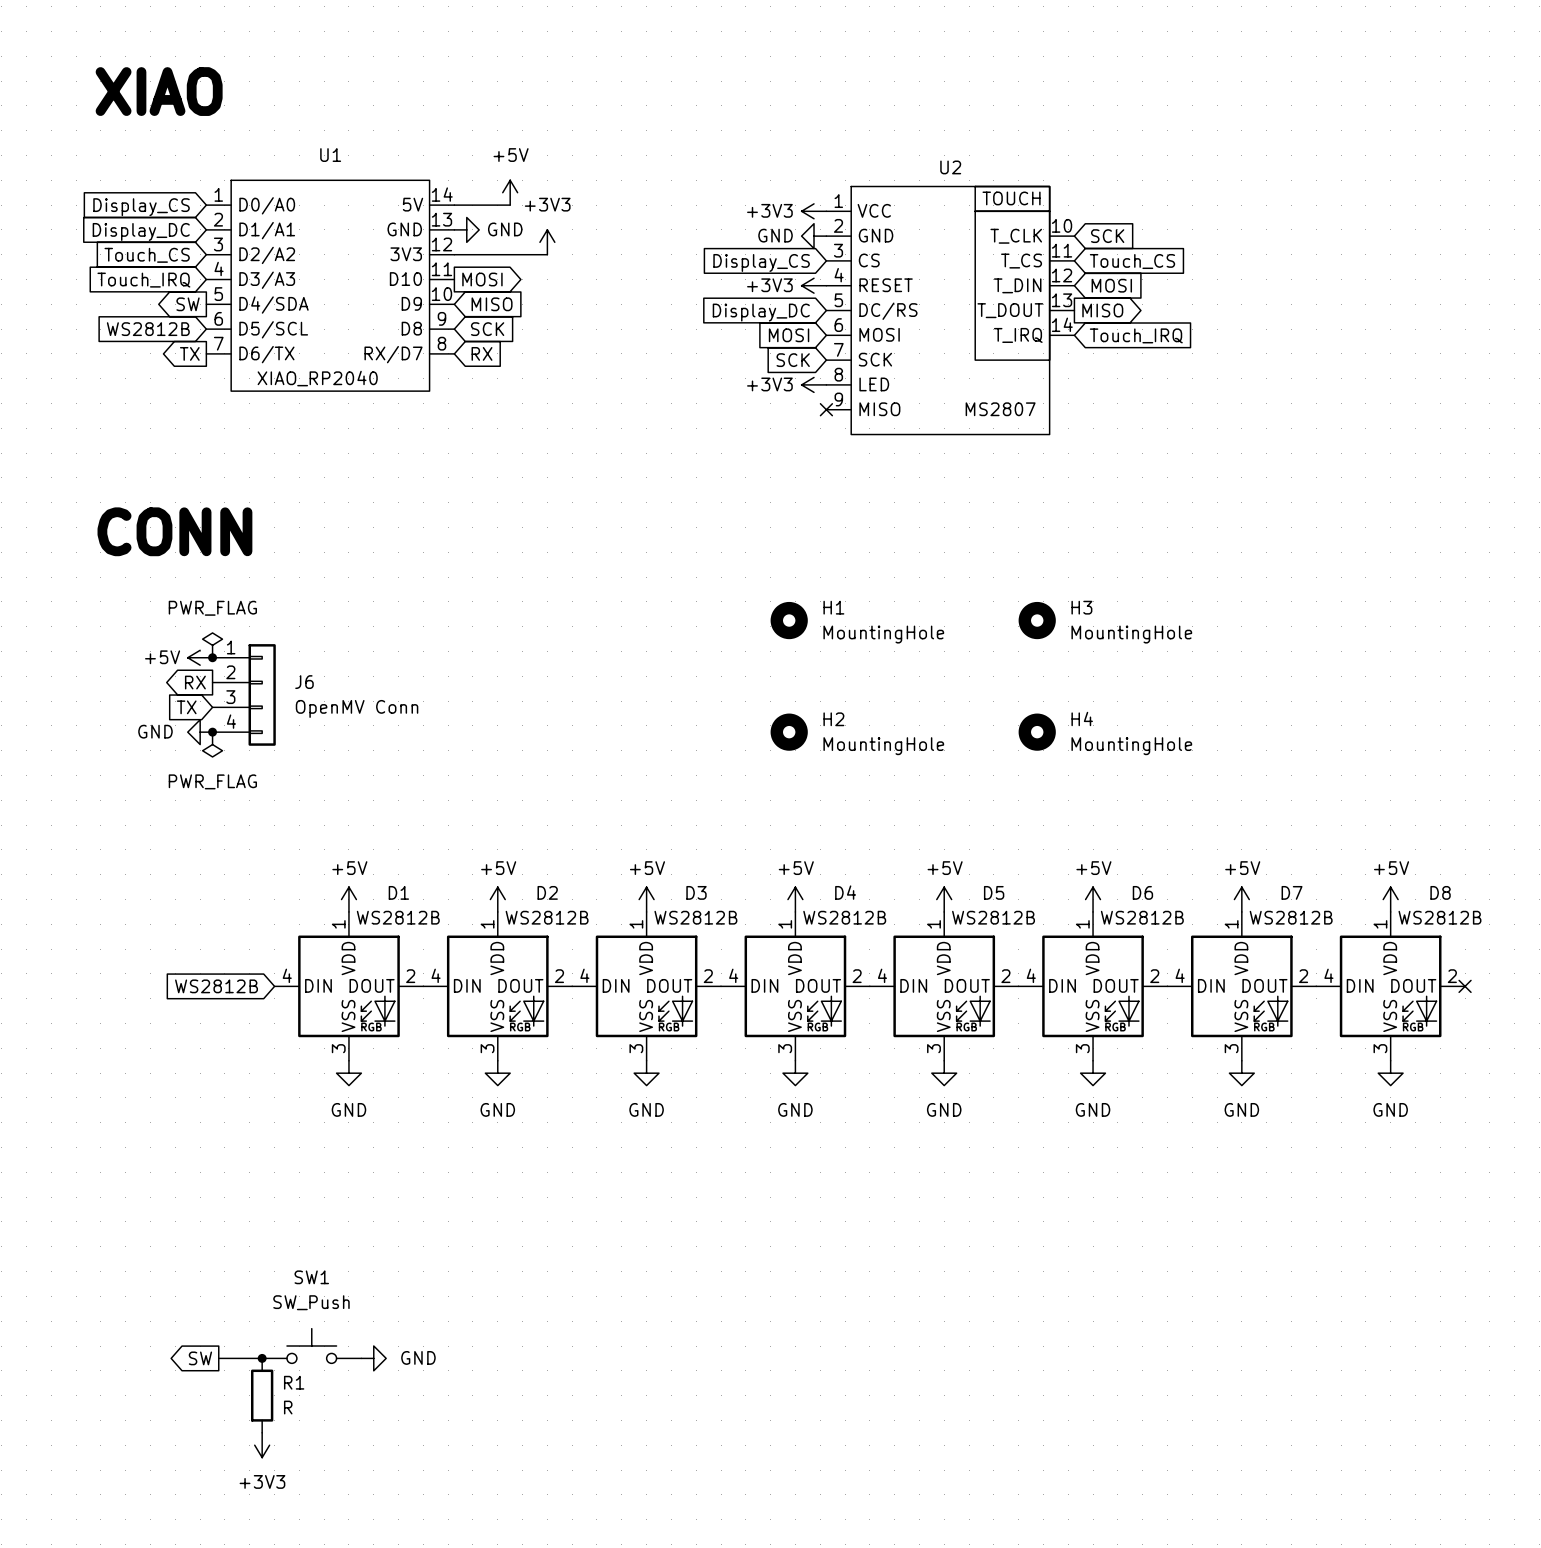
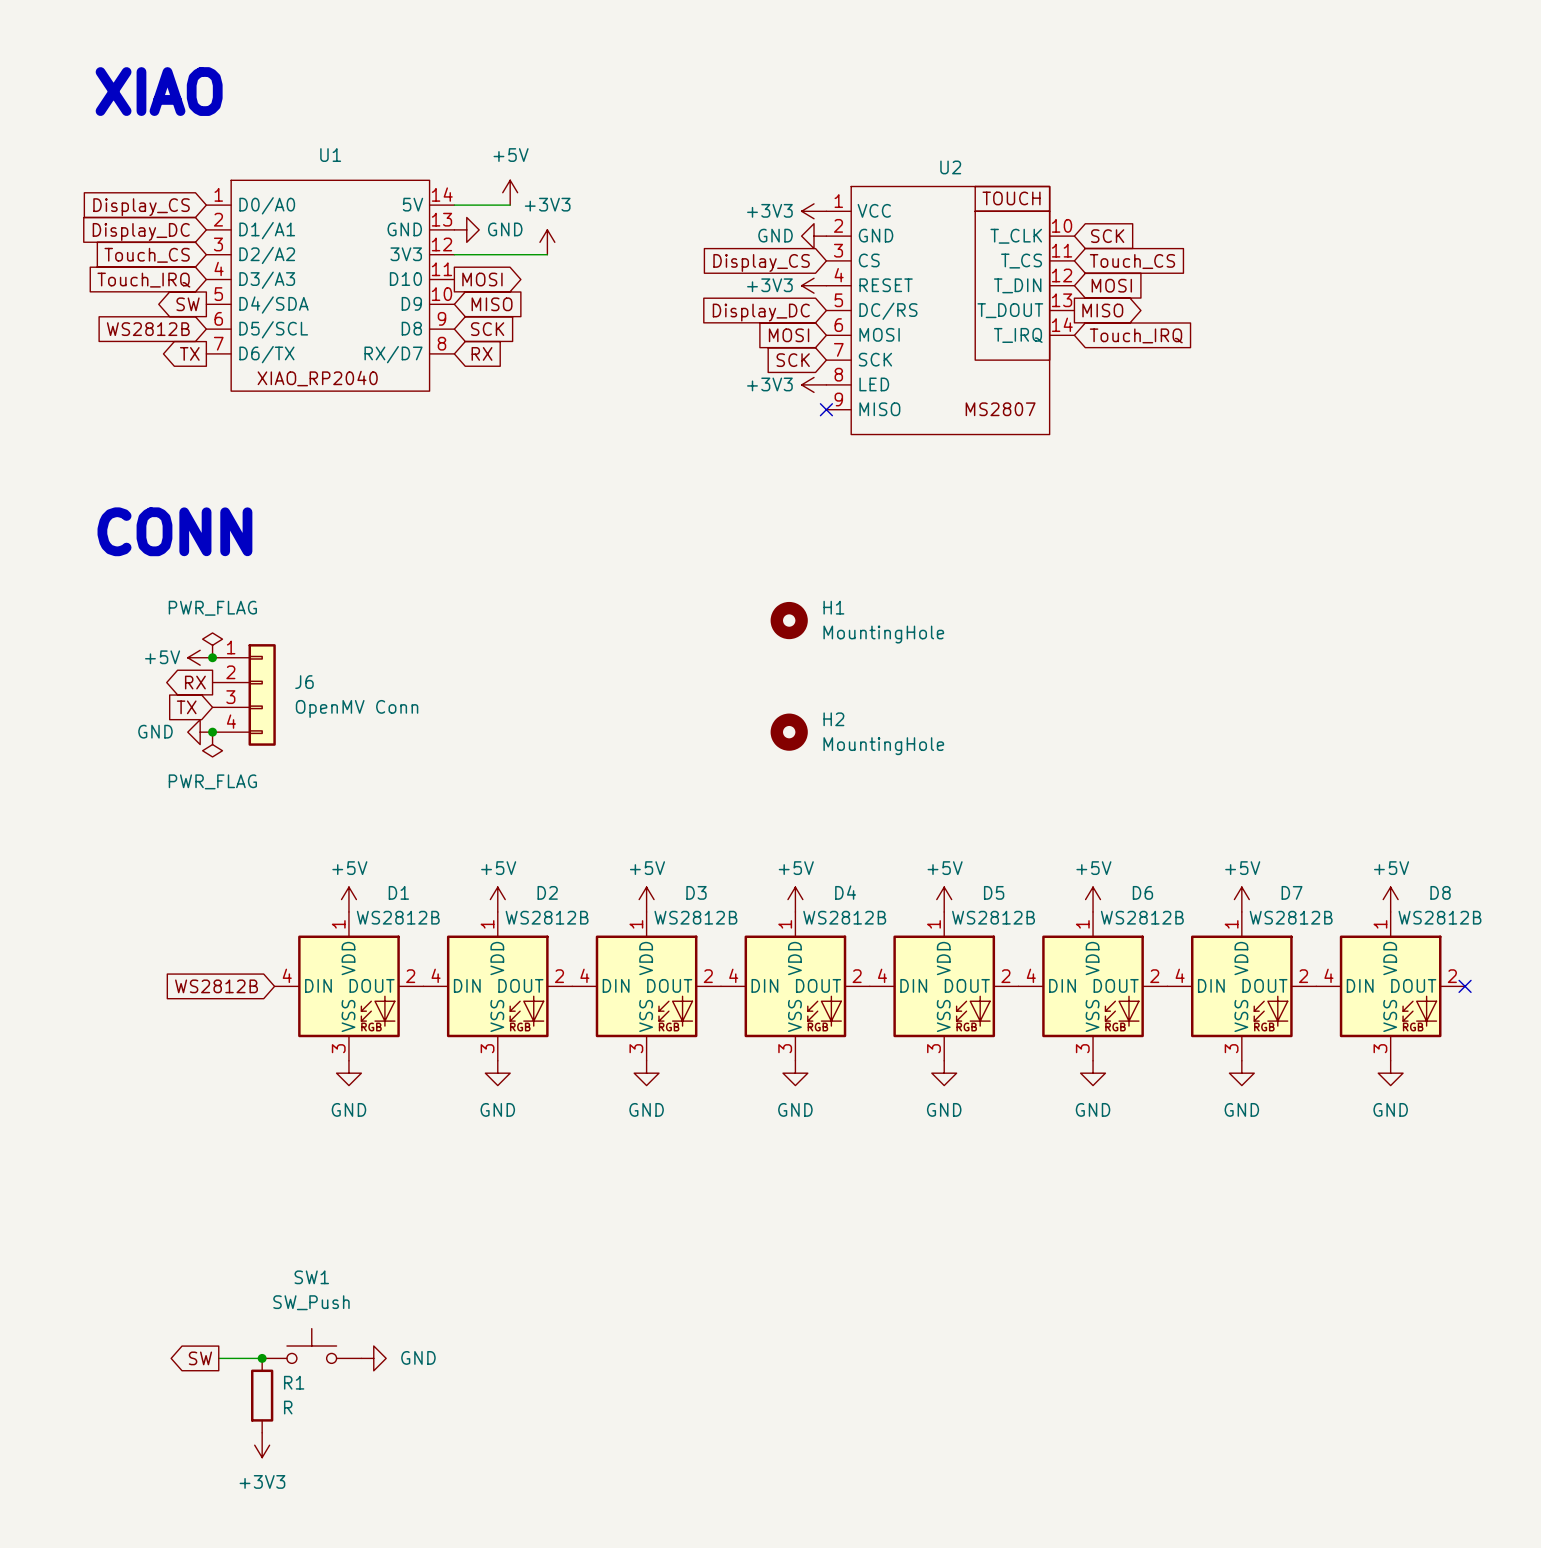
H3: MountingHole (1037, 620) -> none
H4: MountingHole (1037, 732) -> none

